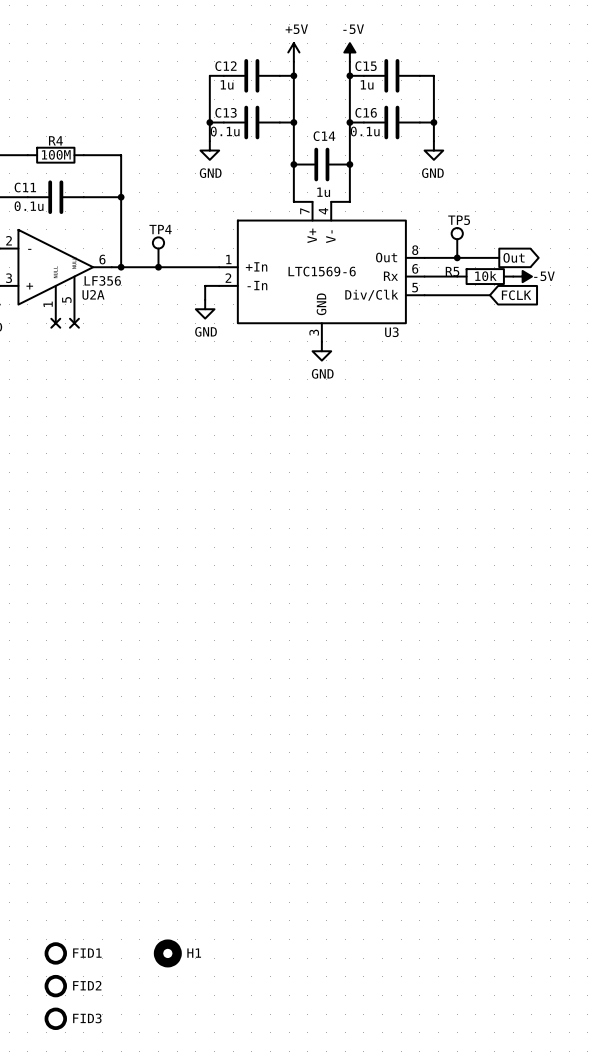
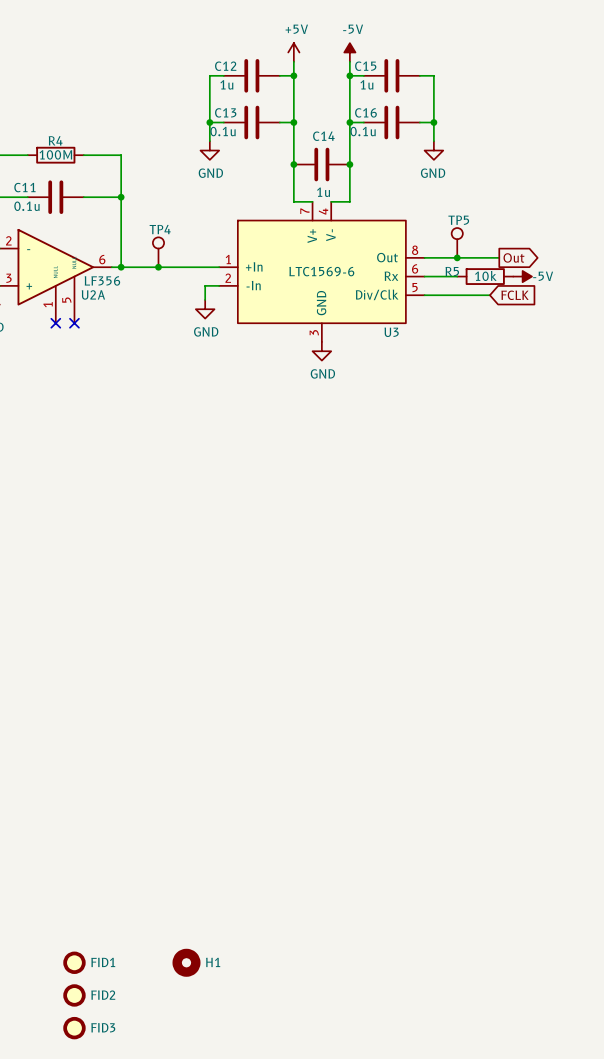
FID1 position: (55, 953) -> (74, 962)
H1 position: (167, 953) -> (186, 962)
FID2 position: (55, 986) -> (74, 995)
FID3 position: (55, 1018) -> (74, 1028)

